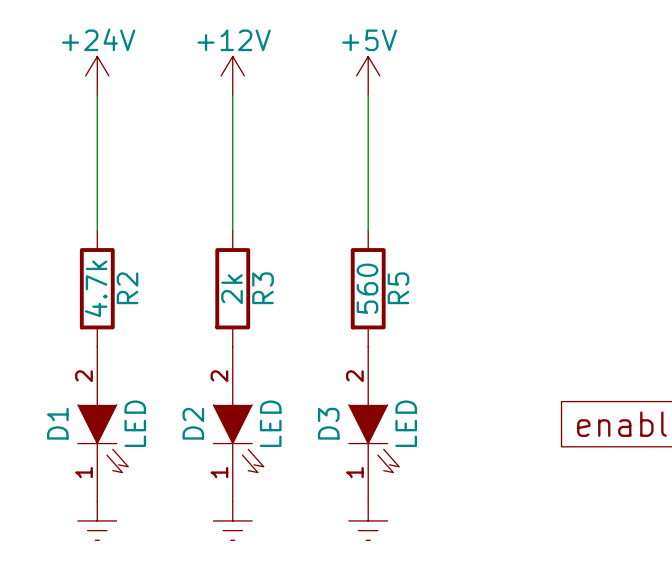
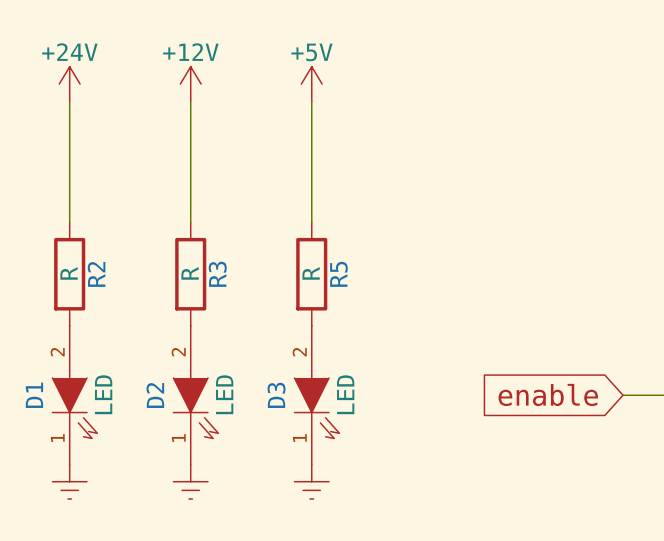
R2 value: 4.7k (96, 288) -> R (69, 273)
R5 value: 560 (367, 288) -> R (311, 273)
R3 value: 2k (232, 289) -> R (190, 273)

